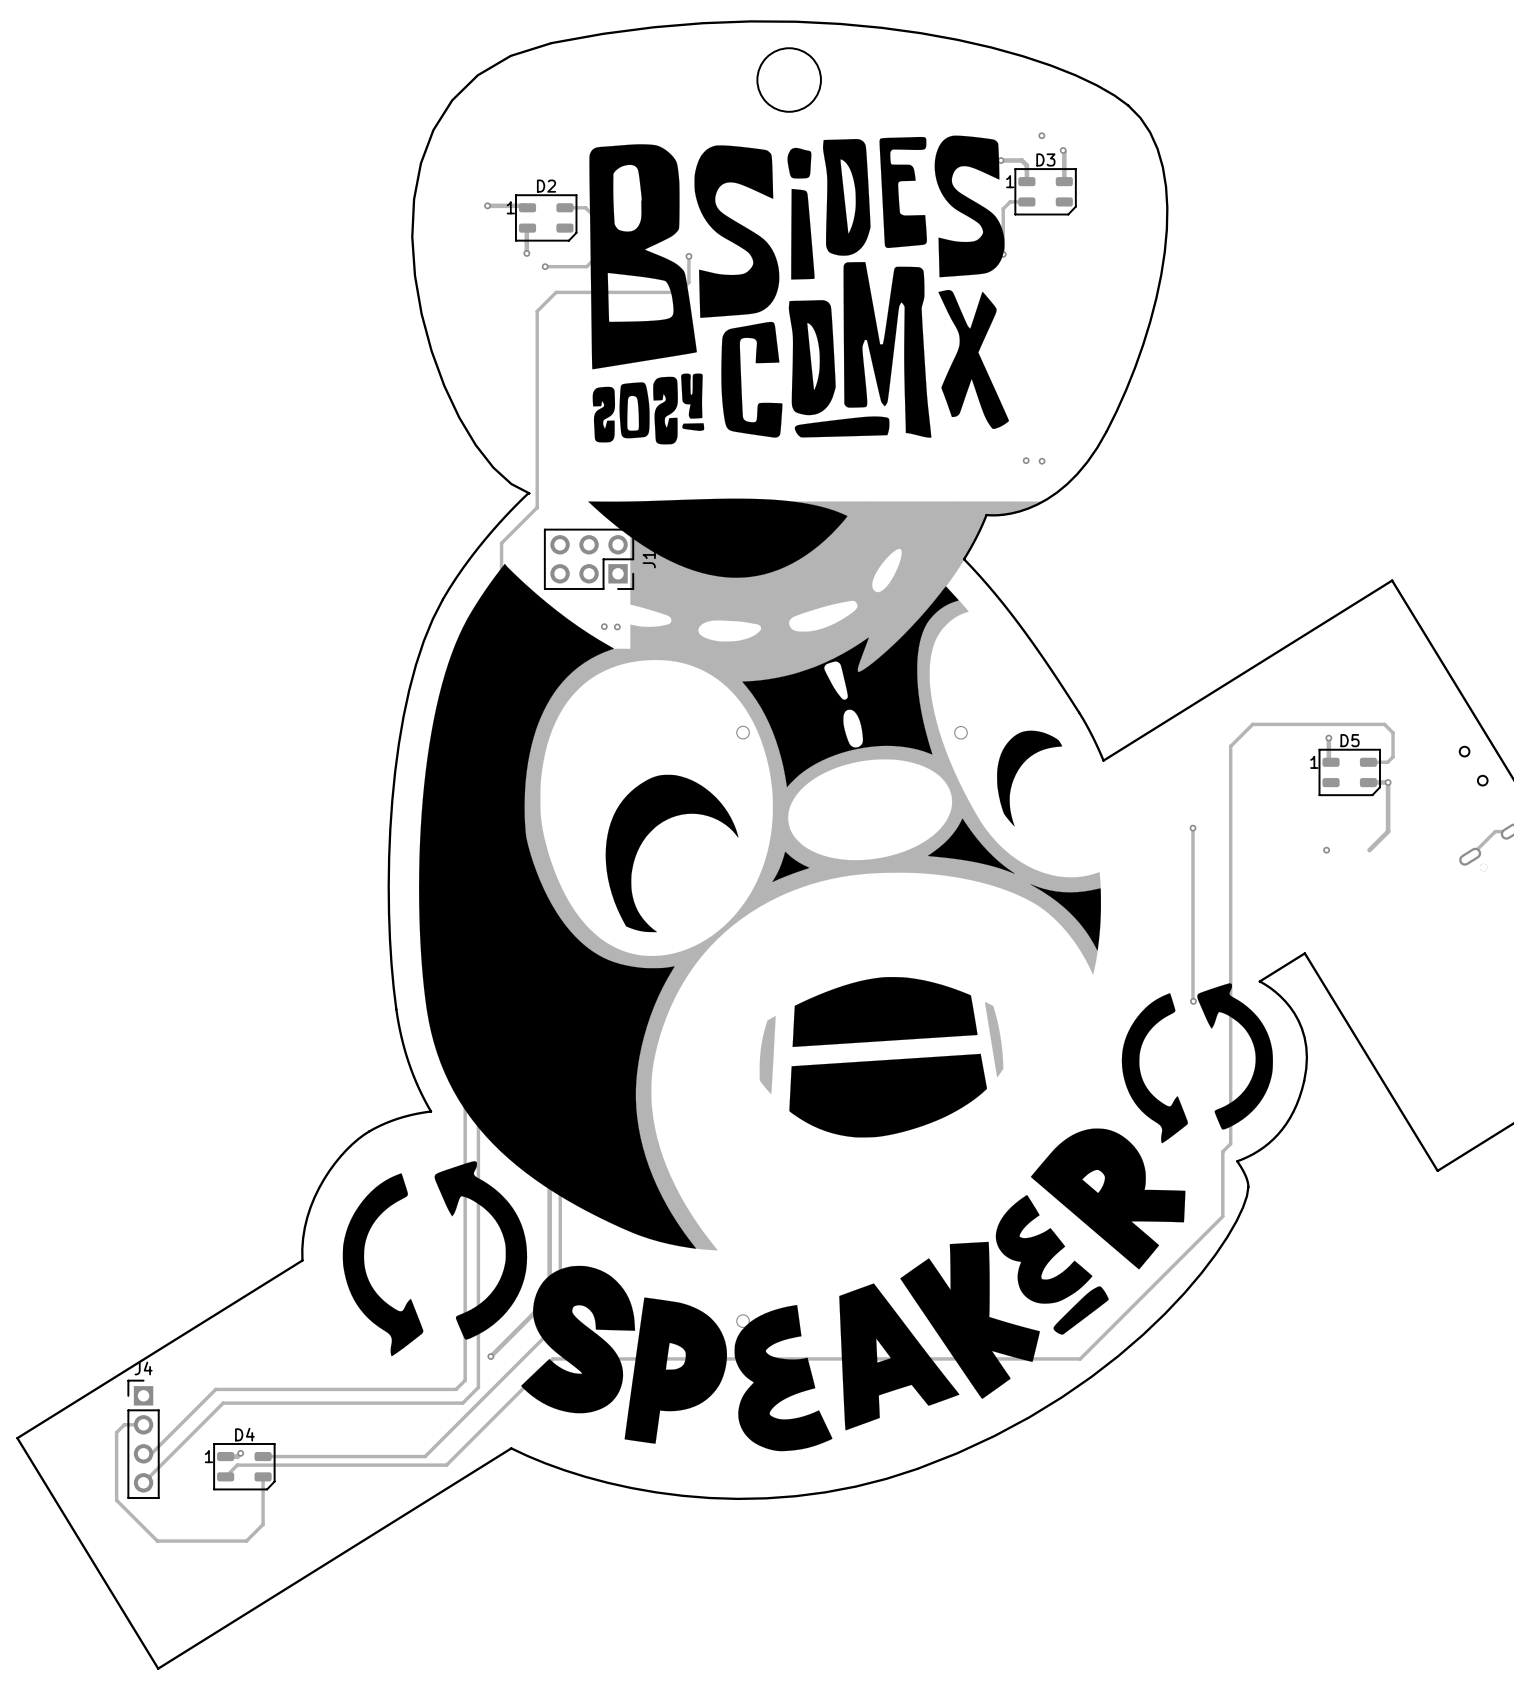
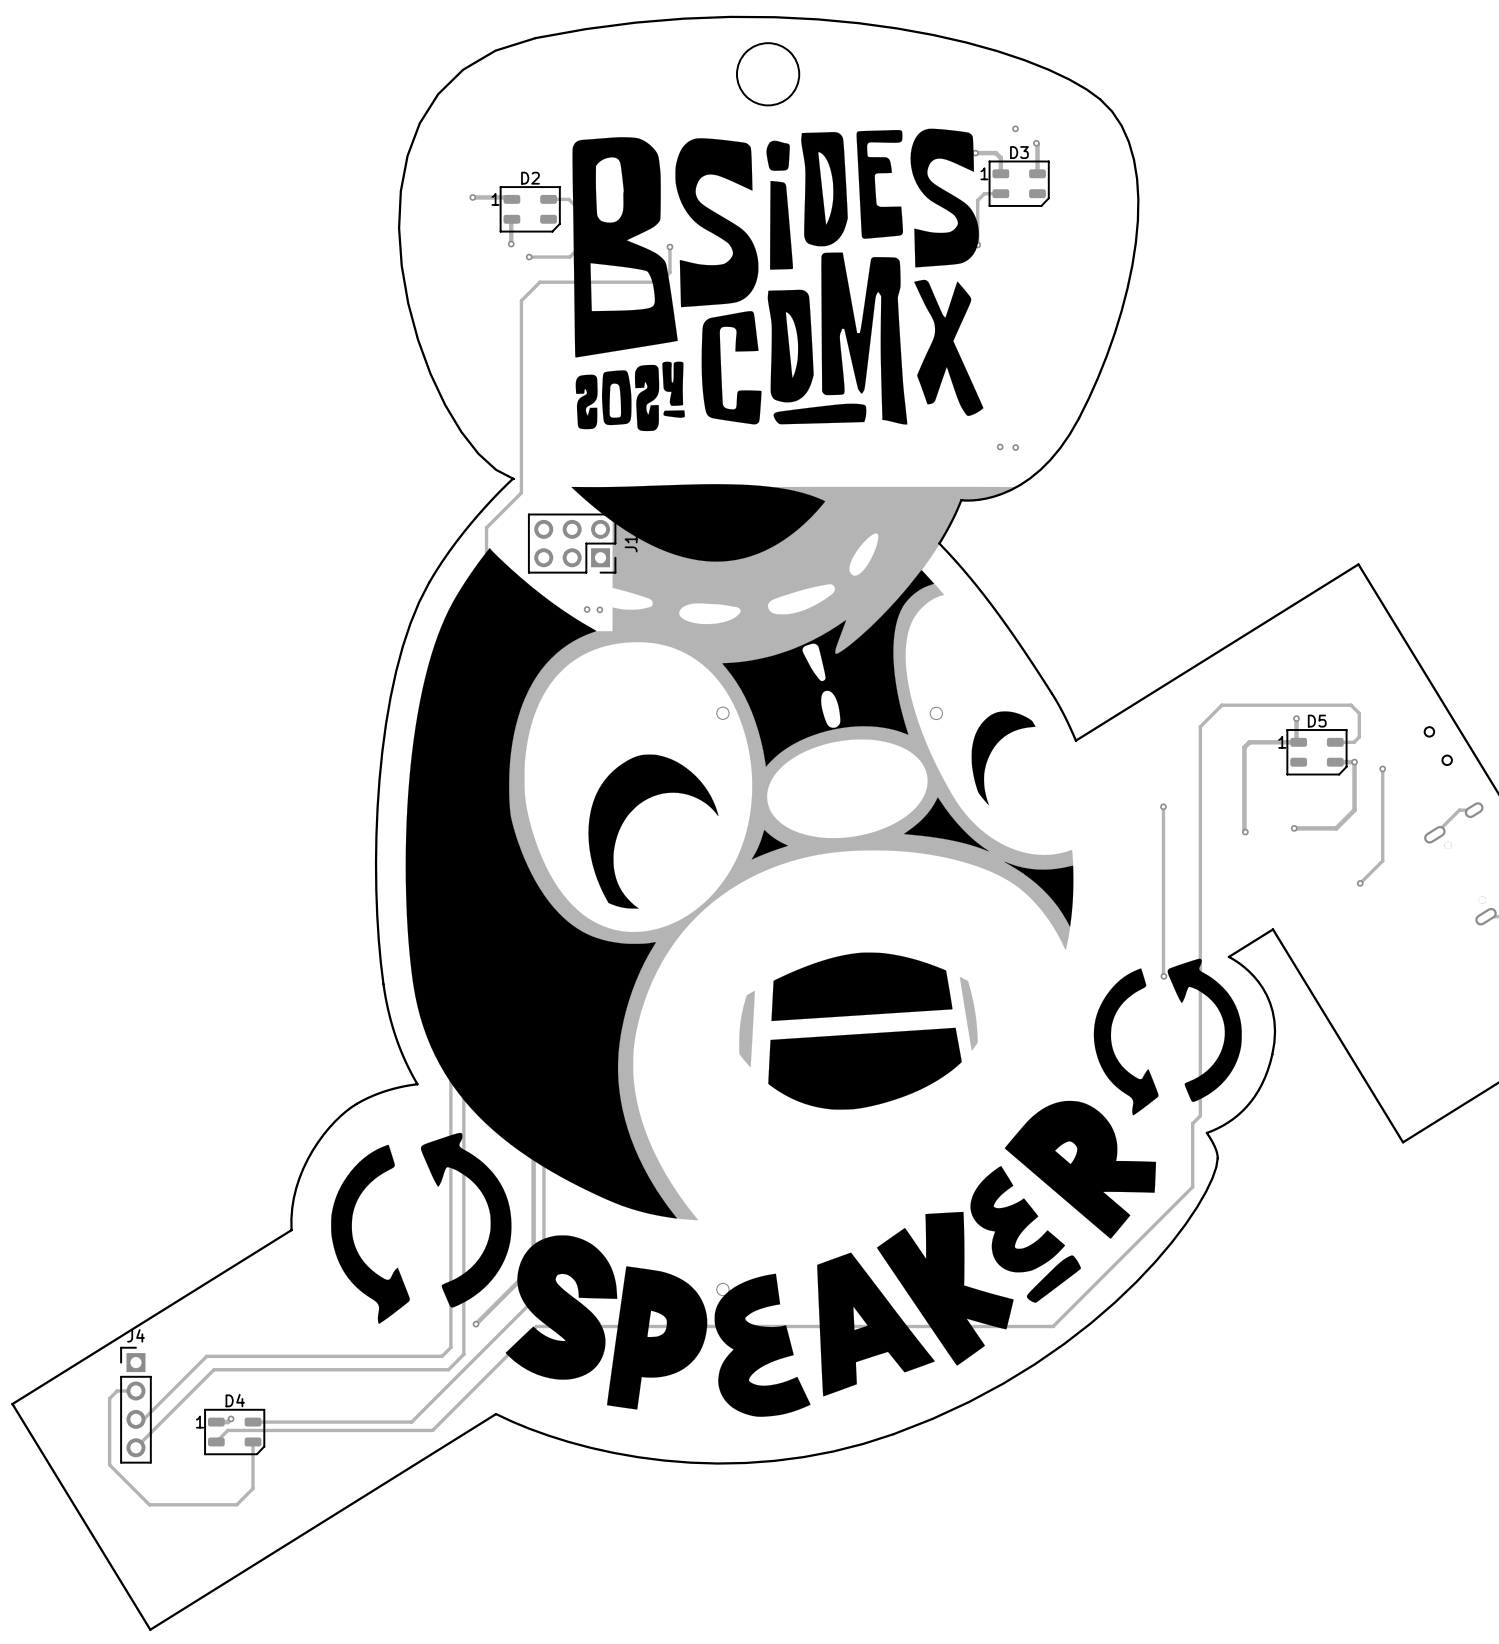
track: none -> (1298, 742) (1249, 742) (1244, 747) (1245, 832)
track: none -> (1382, 768) (1382, 860) (1360, 883)
via: none -> (1382, 768)
track: none -> (1294, 828) (1336, 828)
via: none -> (1245, 832)
via: none -> (1360, 883)

